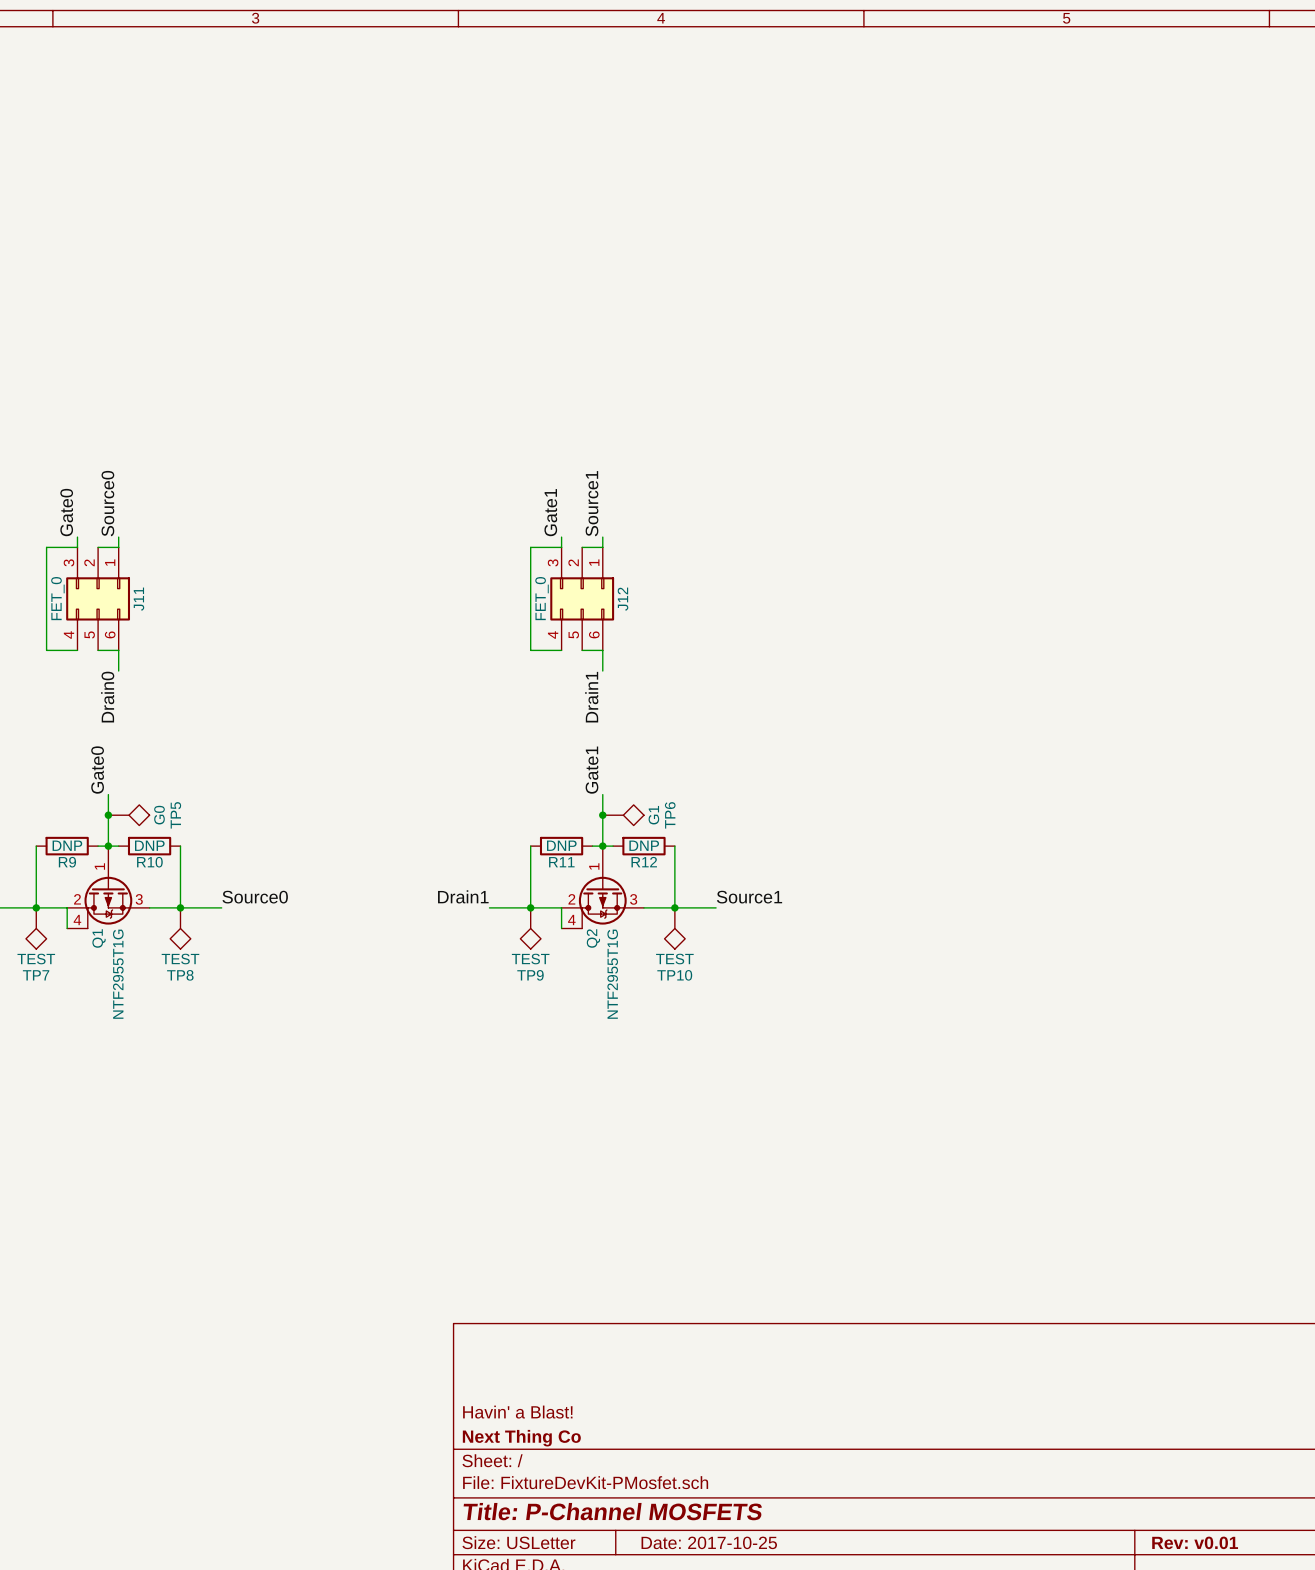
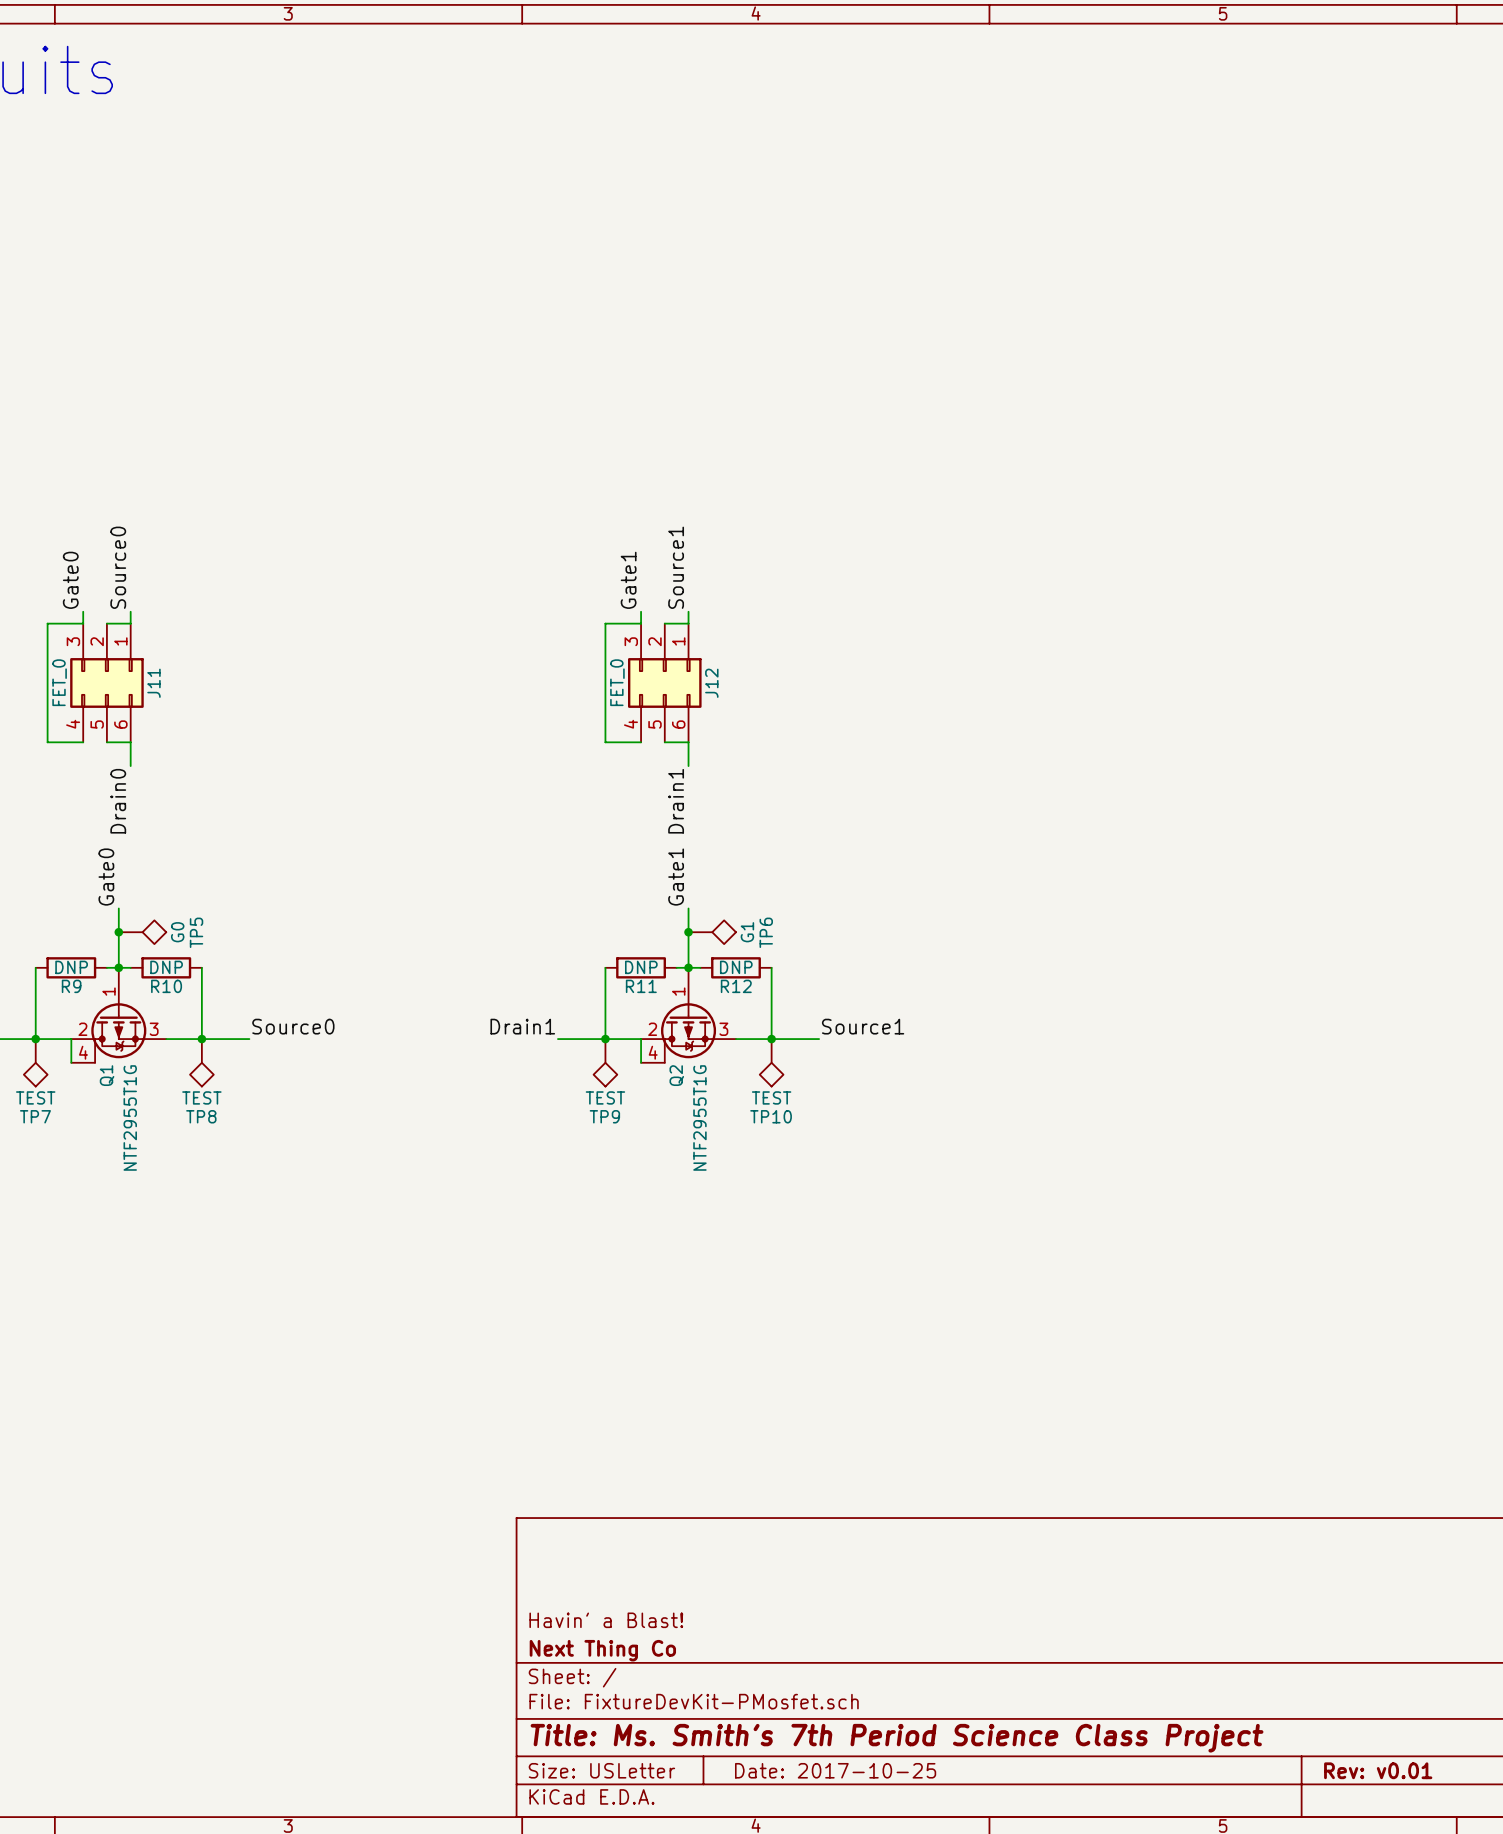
title block: Title: P-Channel MOSFETS (612, 1511) -> Title: Ms. Smith's 7th Period Science Class Project (897, 1738)

